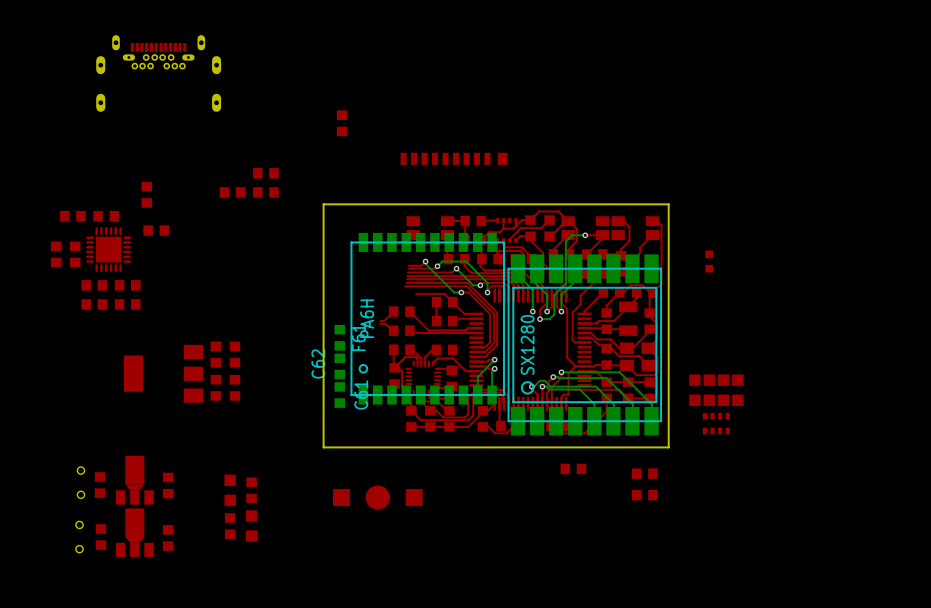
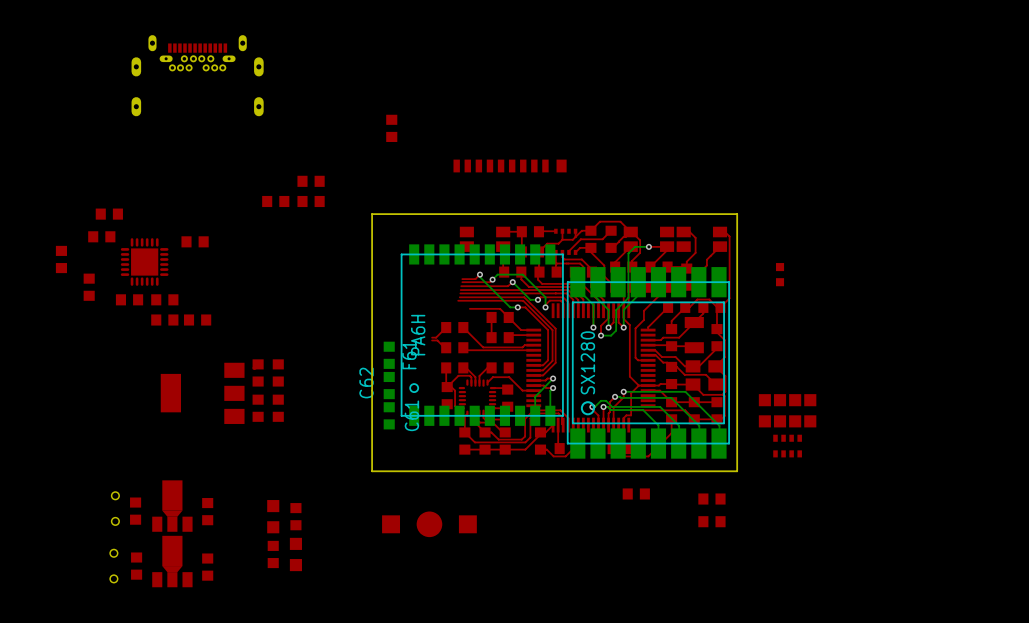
part: (146, 194) -> none
part: none -> (109, 214)
part: (72, 216) -> none
part: (106, 216) -> none
part: none -> (101, 236)
part: none -> (61, 259)
part: (56, 254) -> none
part: (75, 254) -> none
part: none -> (89, 287)
part: (94, 304) -> none
part: none -> (197, 320)

